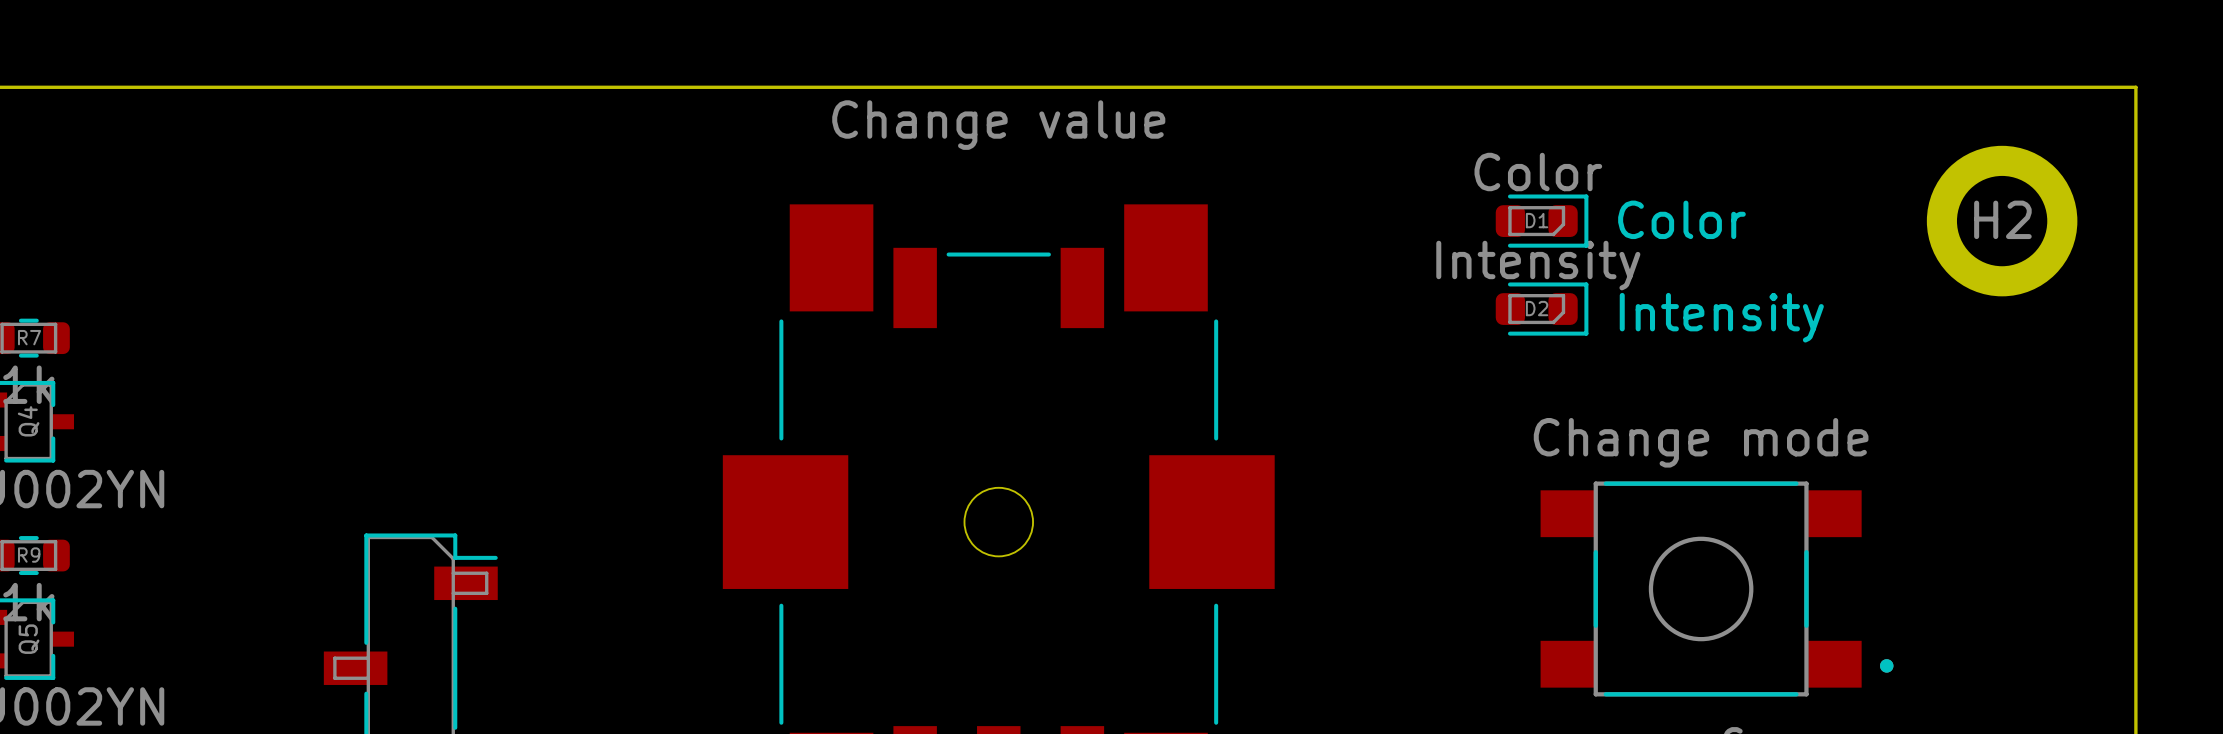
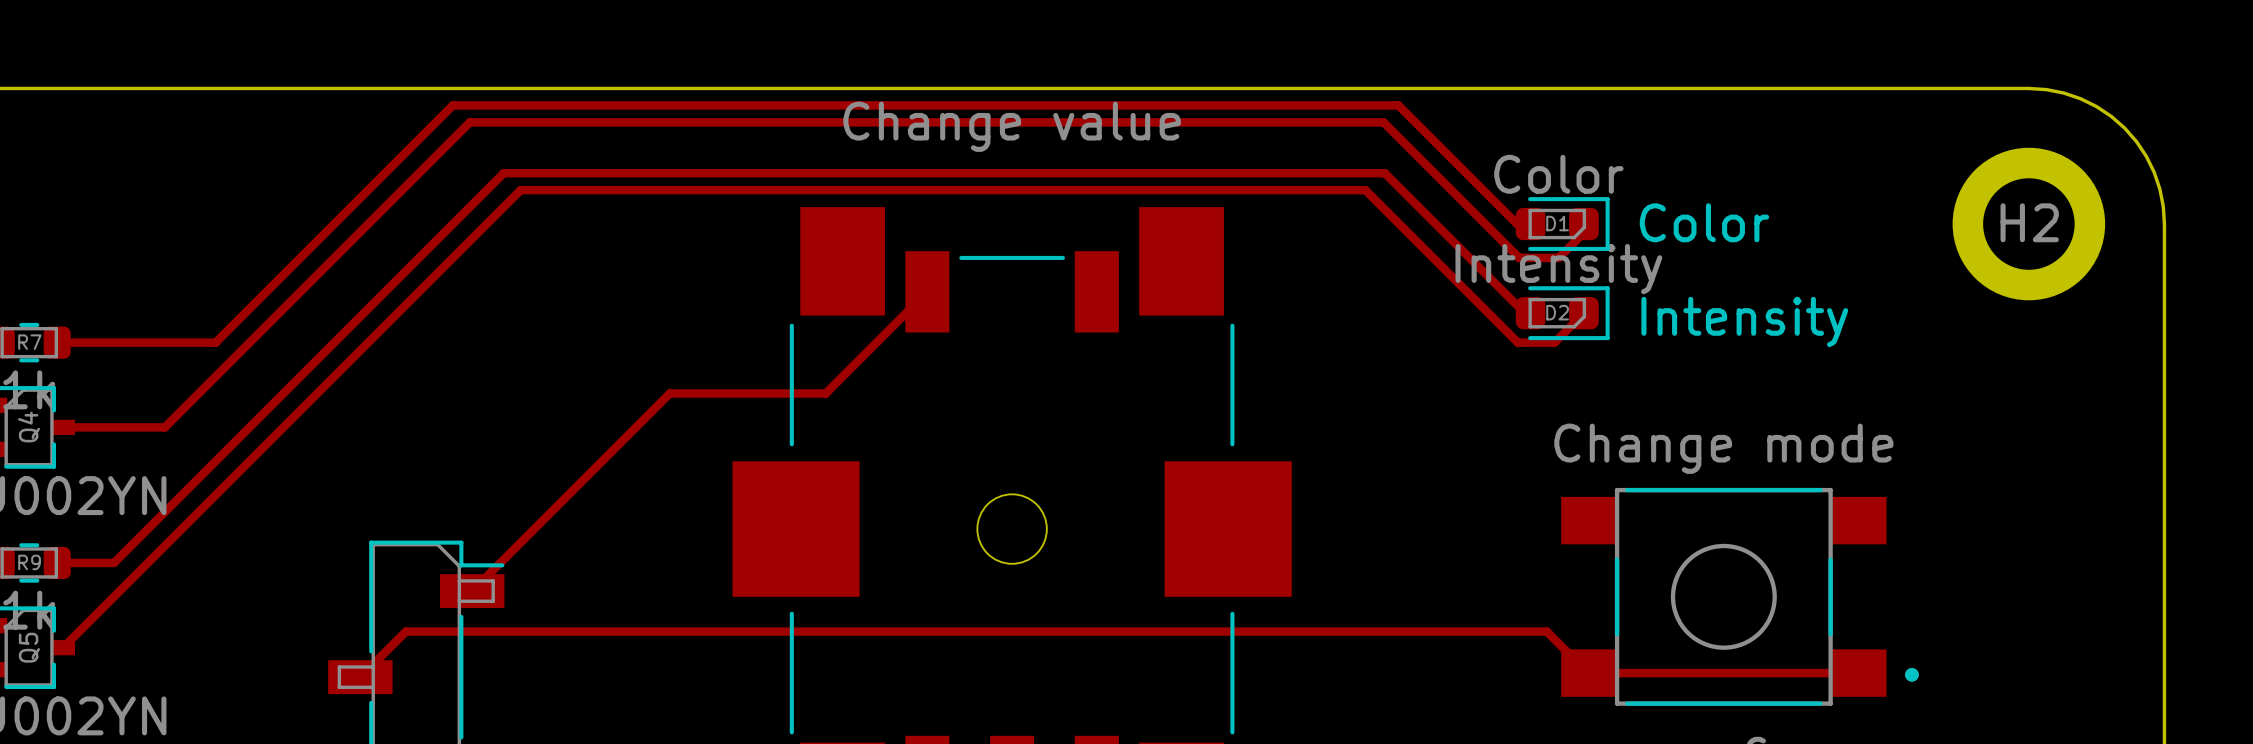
board edge: (2002, 87) (2135, 87) (2135, 221) -> (2028, 88) (2063, 93) (2080, 98) (2096, 106) (2124, 128) (2146, 156) (2154, 172) (2159, 188) (2164, 224)
top track: none -> (1530, 224) (1517, 224) (1398, 105) (452, 105) (215, 342) (57, 342)
top track: none -> (1583, 224) (1583, 232) (1558, 257) (1519, 257) (1383, 122) (469, 122) (164, 427) (63, 427)
top track: none -> (927, 291) (825, 393) (669, 393) (472, 591)
top track: none -> (1530, 313) (1524, 313) (1384, 173) (503, 173) (113, 562) (57, 562)
top track: none -> (1583, 313) (1554, 342) (1517, 342) (1365, 190) (520, 190) (63, 647)
top track: none -> (1859, 673) (1588, 673) (1546, 631) (405, 631) (360, 677)

